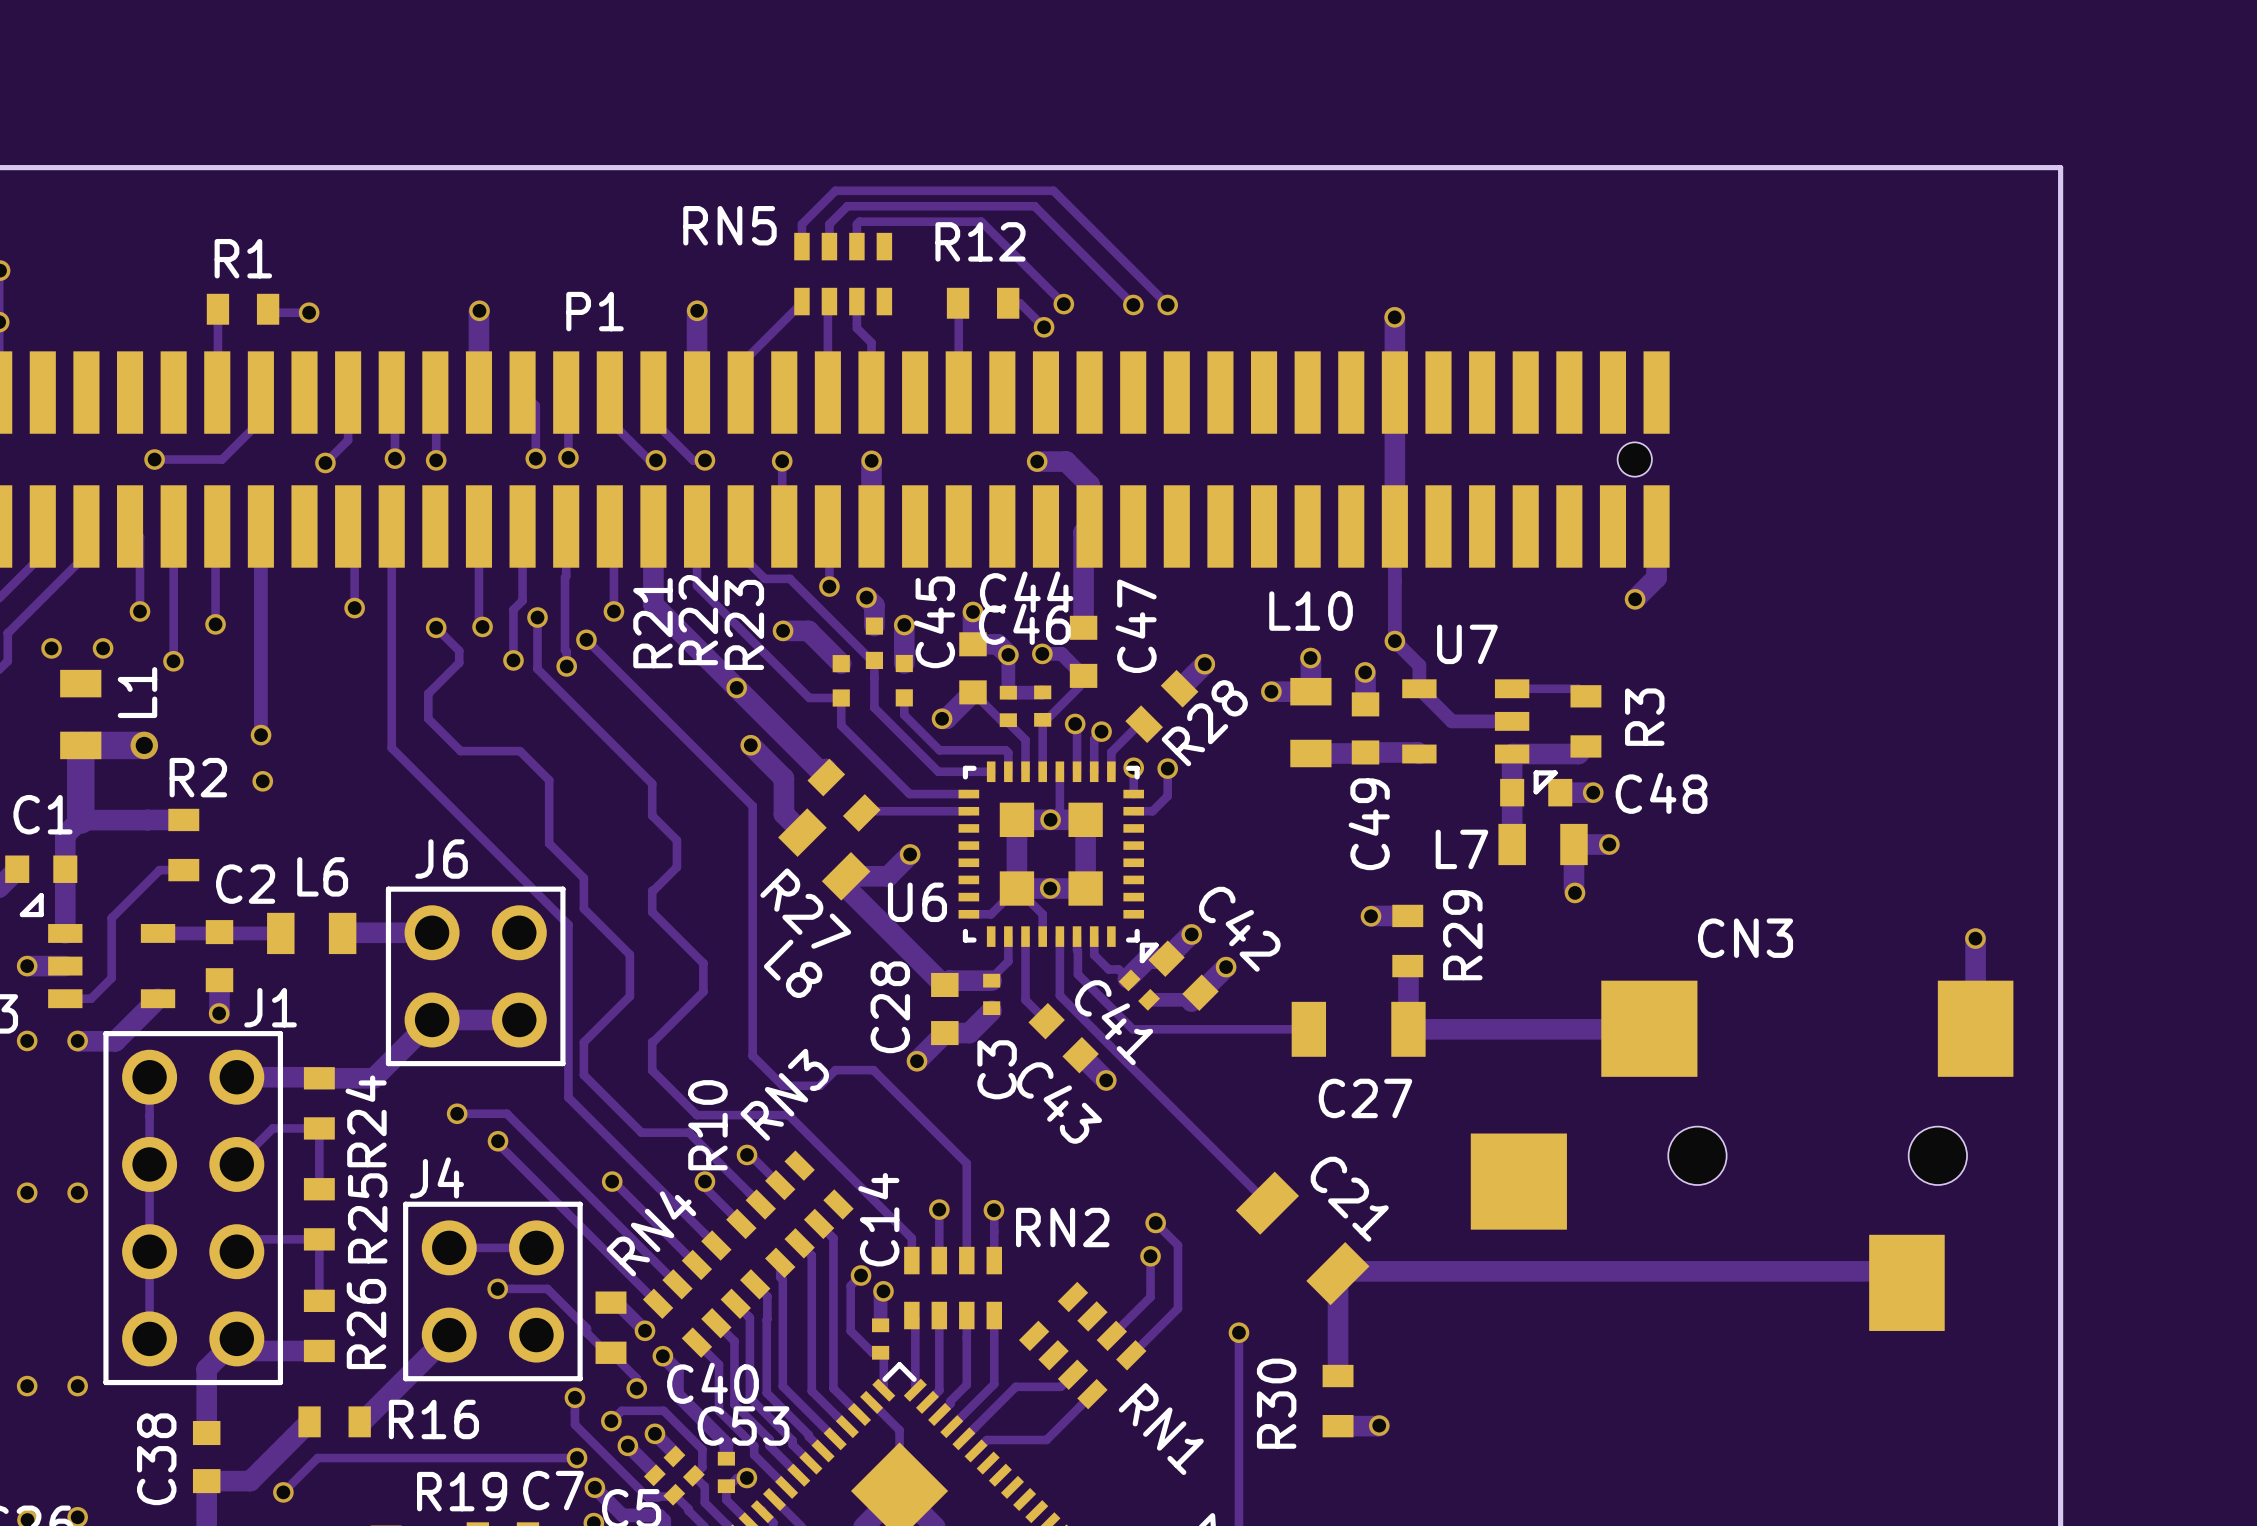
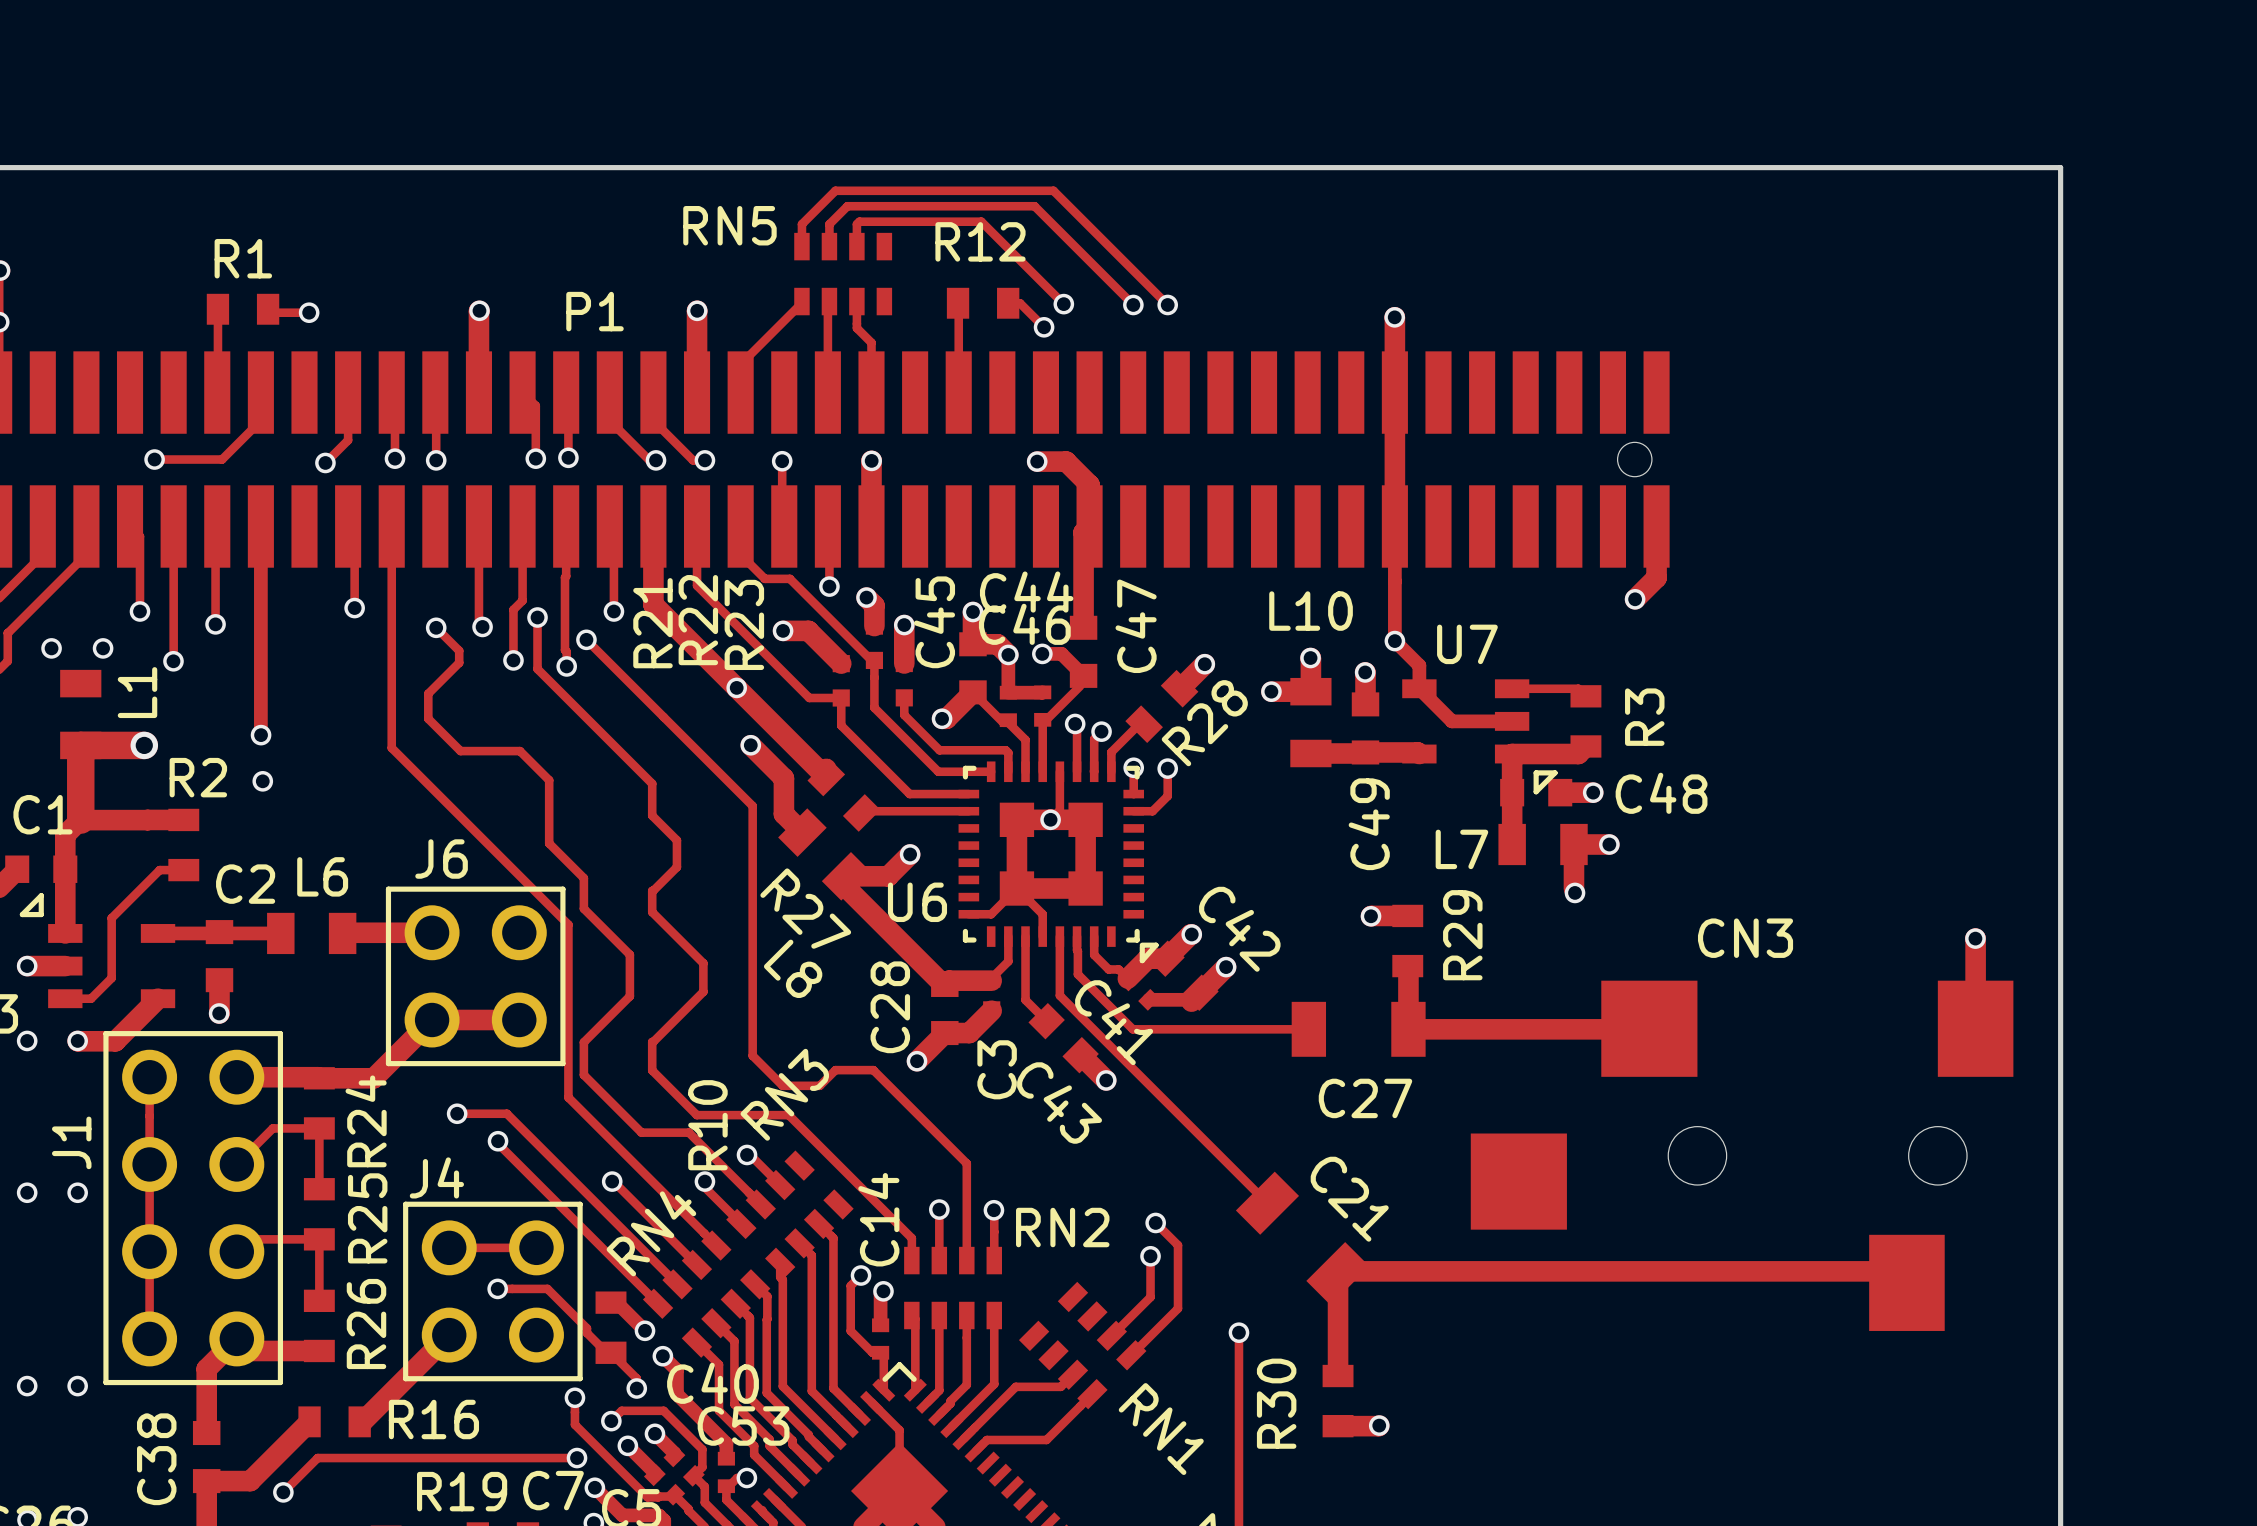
via: (1050, 888) -> none
J1 name rotation: 0° (270, 1007) -> 90° counterclockwise (71, 1142)
J1 name position: J1 (270, 1007) -> J1 (71, 1142)

